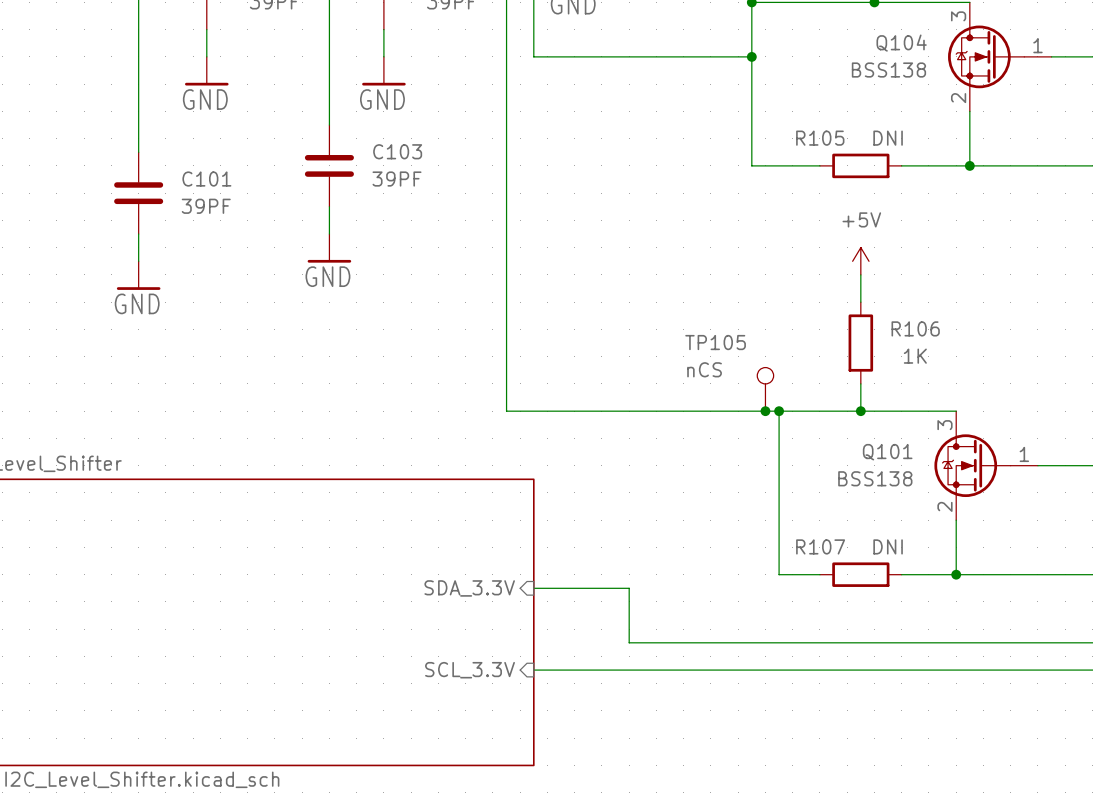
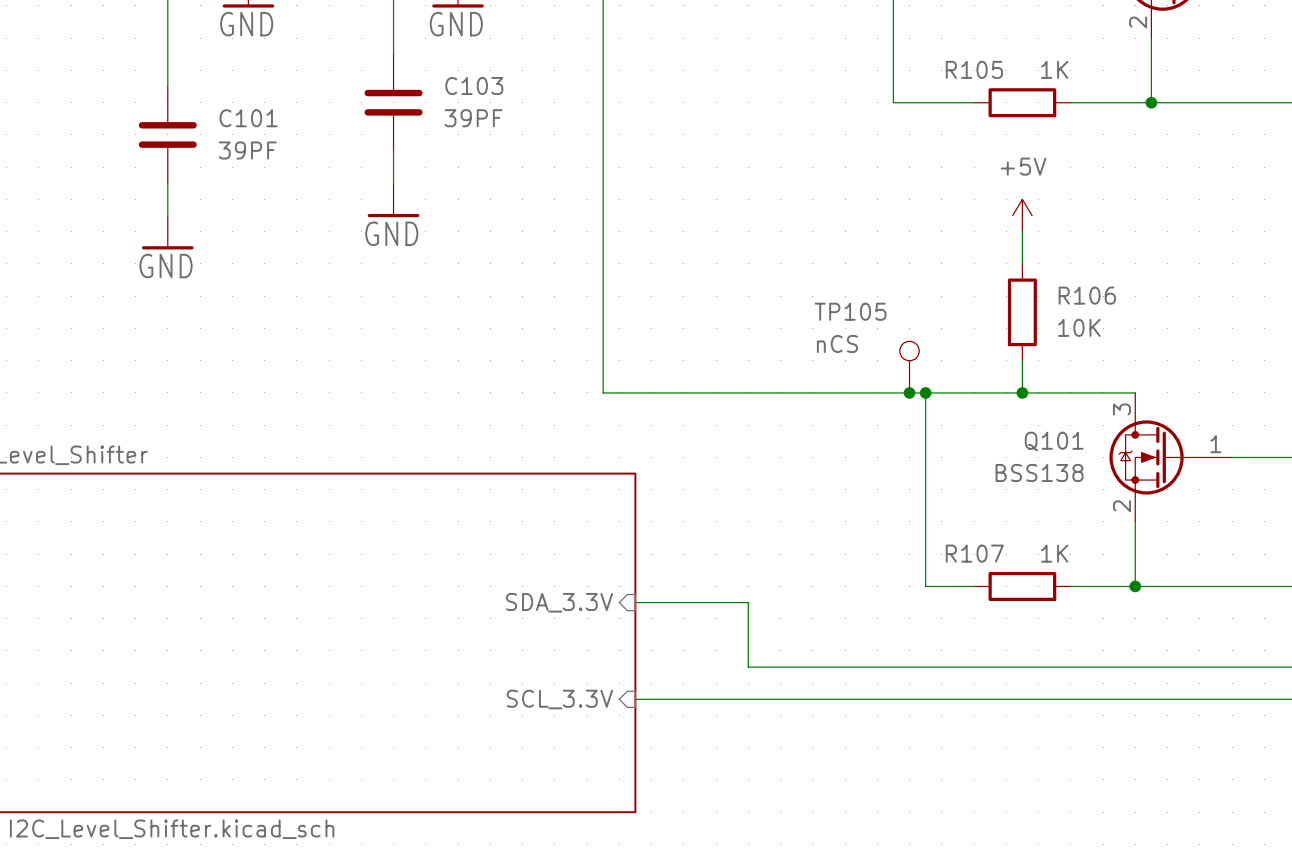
R105 value: DNI (888, 138) -> 1K (1054, 69)
R106 value: 1K (915, 356) -> 10K (1079, 327)
R107 value: DNI (888, 546) -> 1K (1054, 553)

